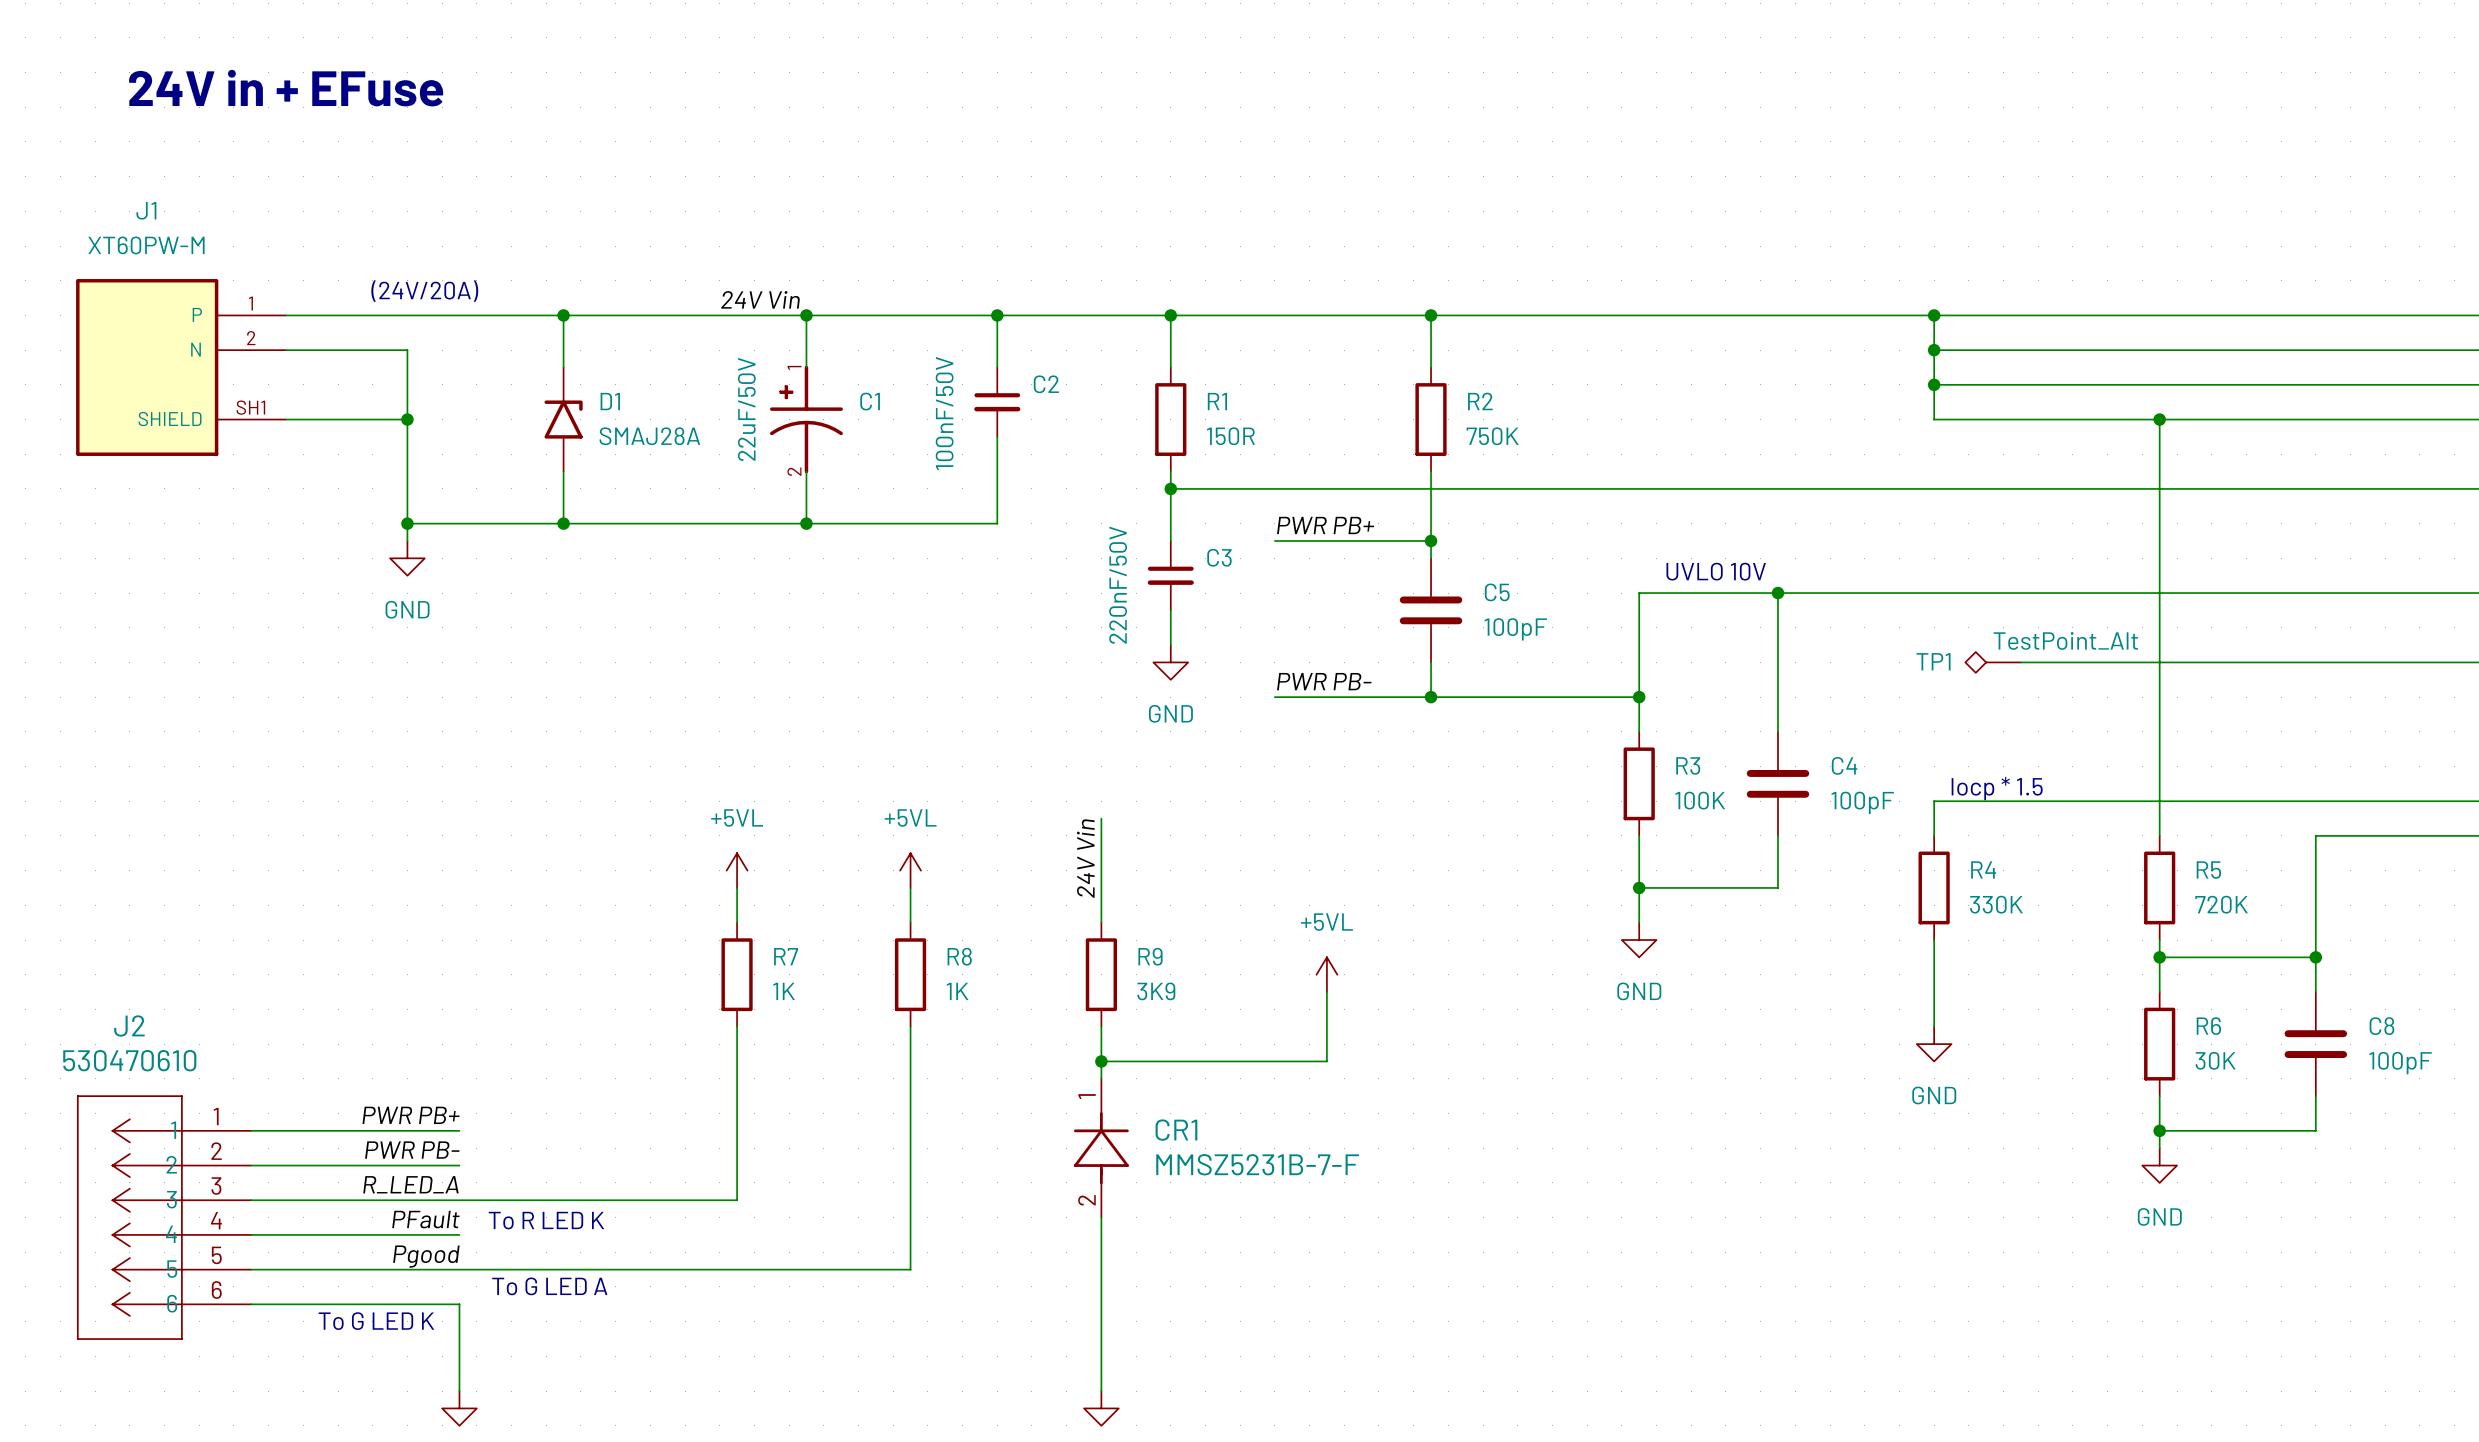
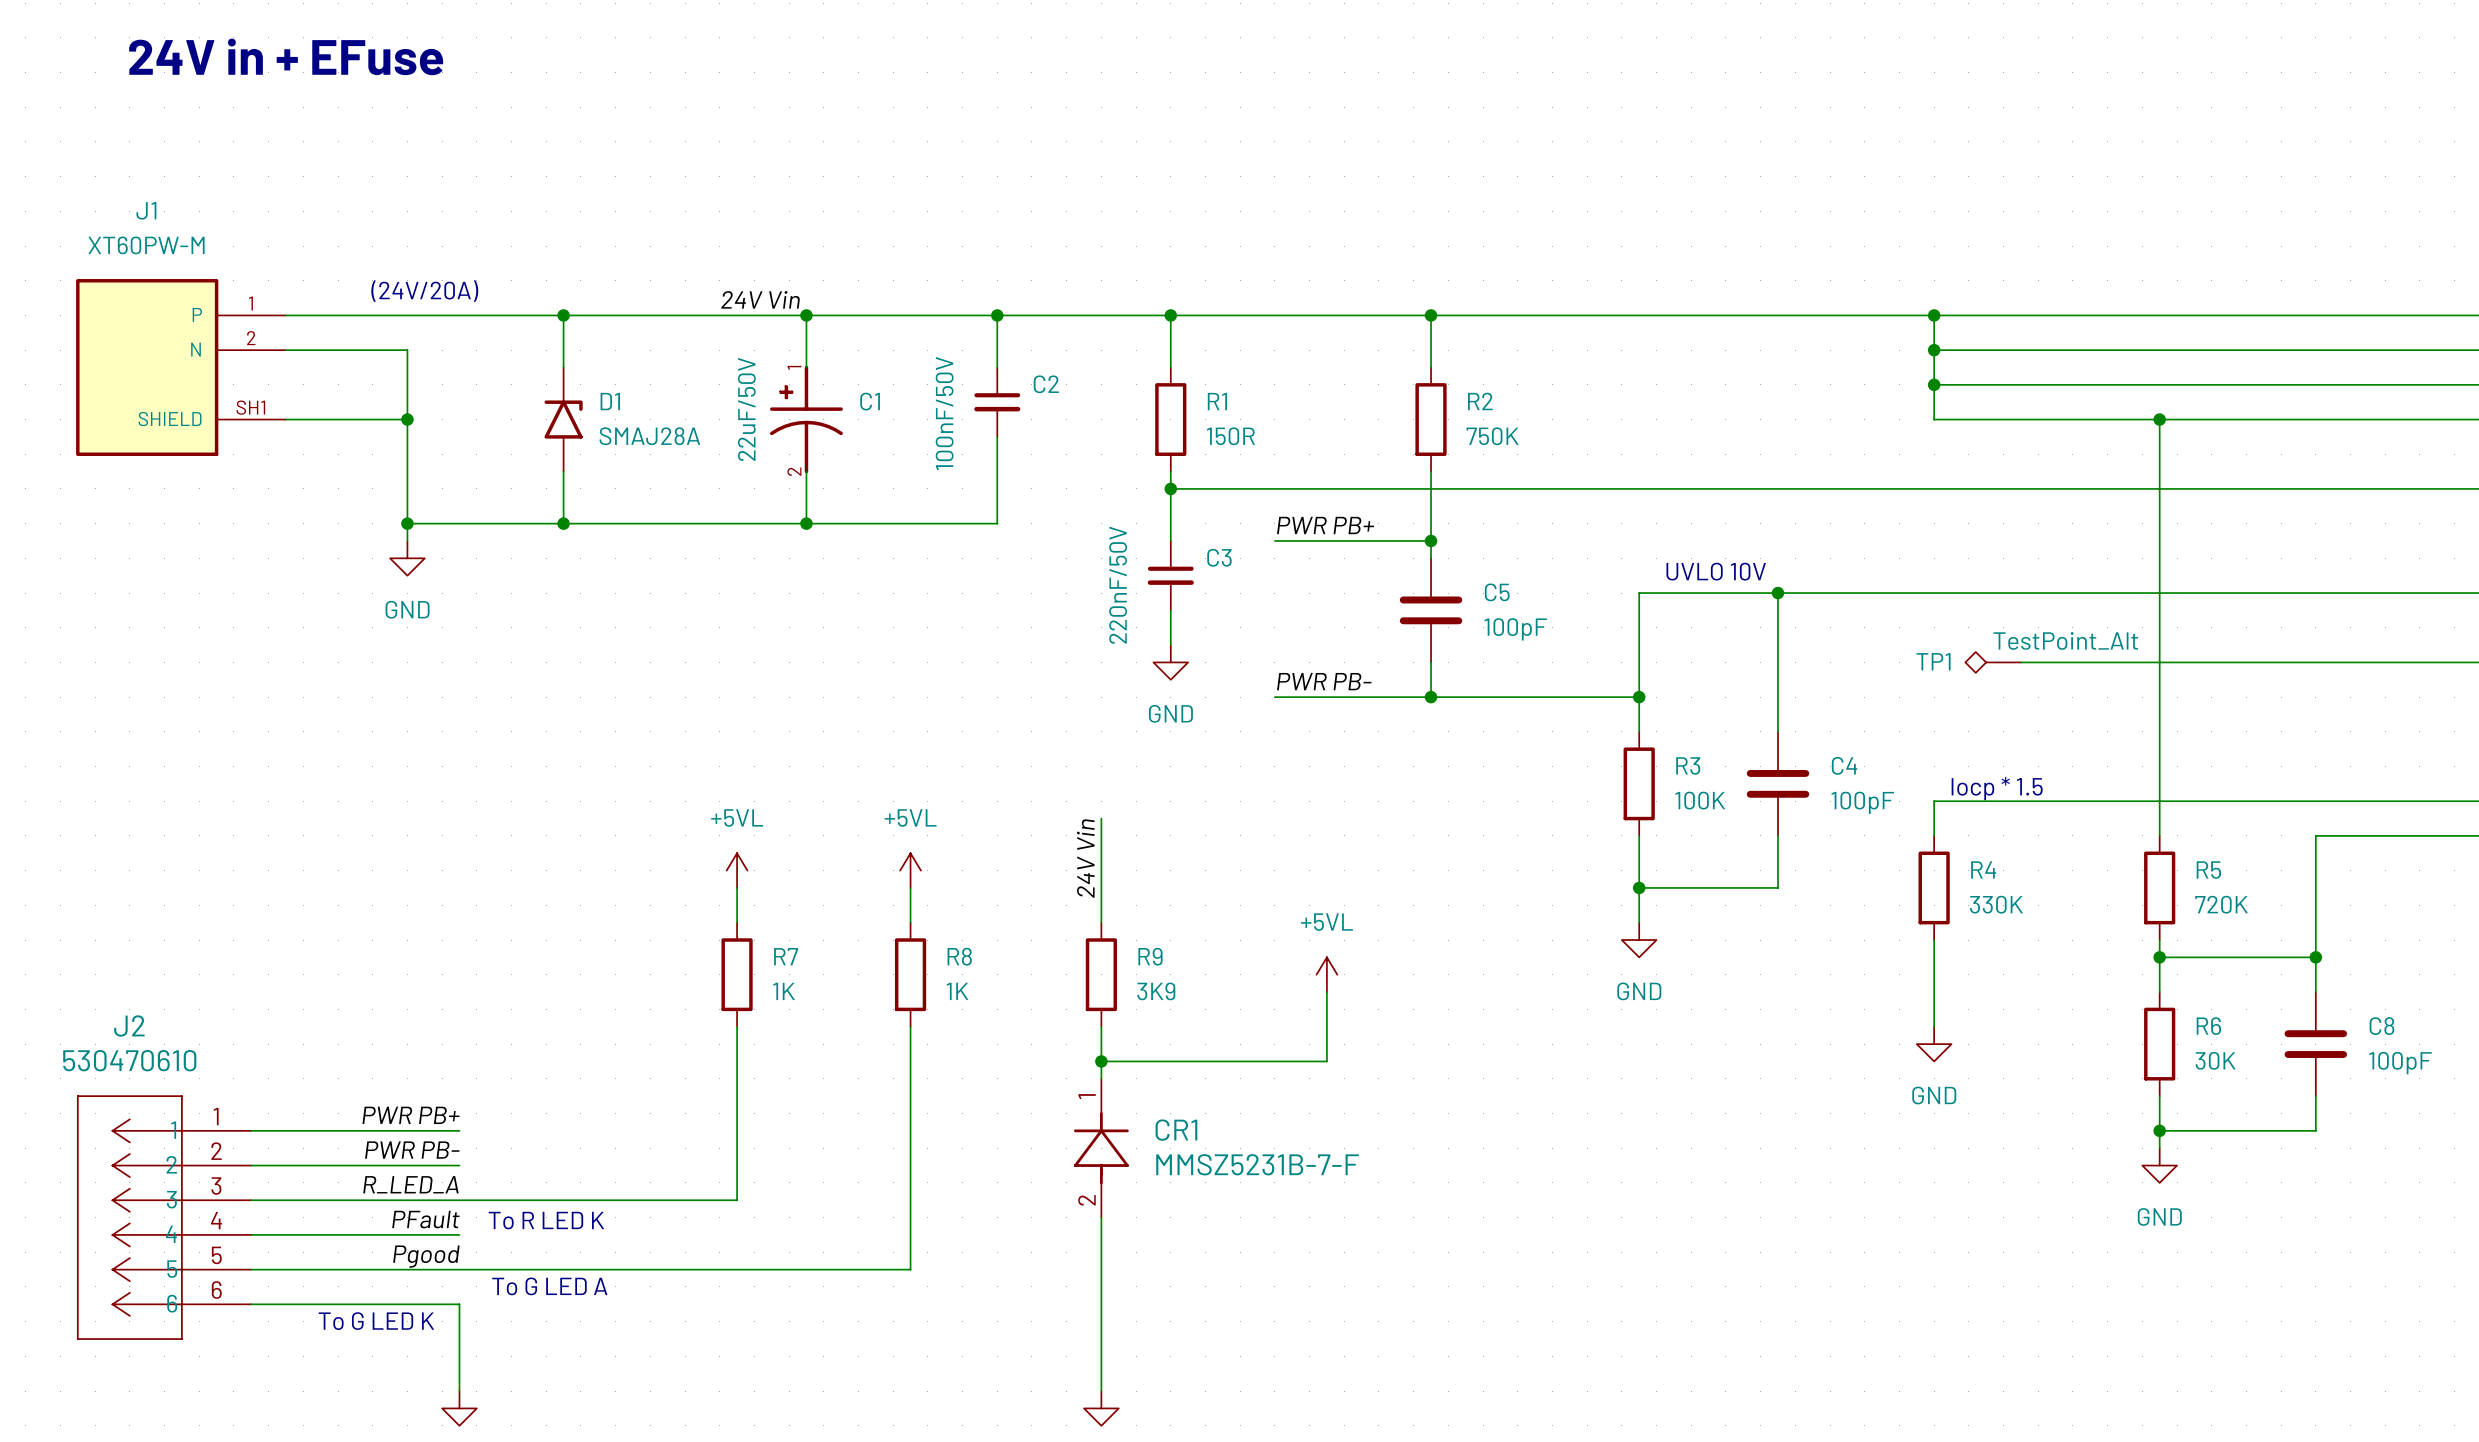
text position: 24V in + EFuse (286, 88) -> 24V in + EFuse (286, 56)

